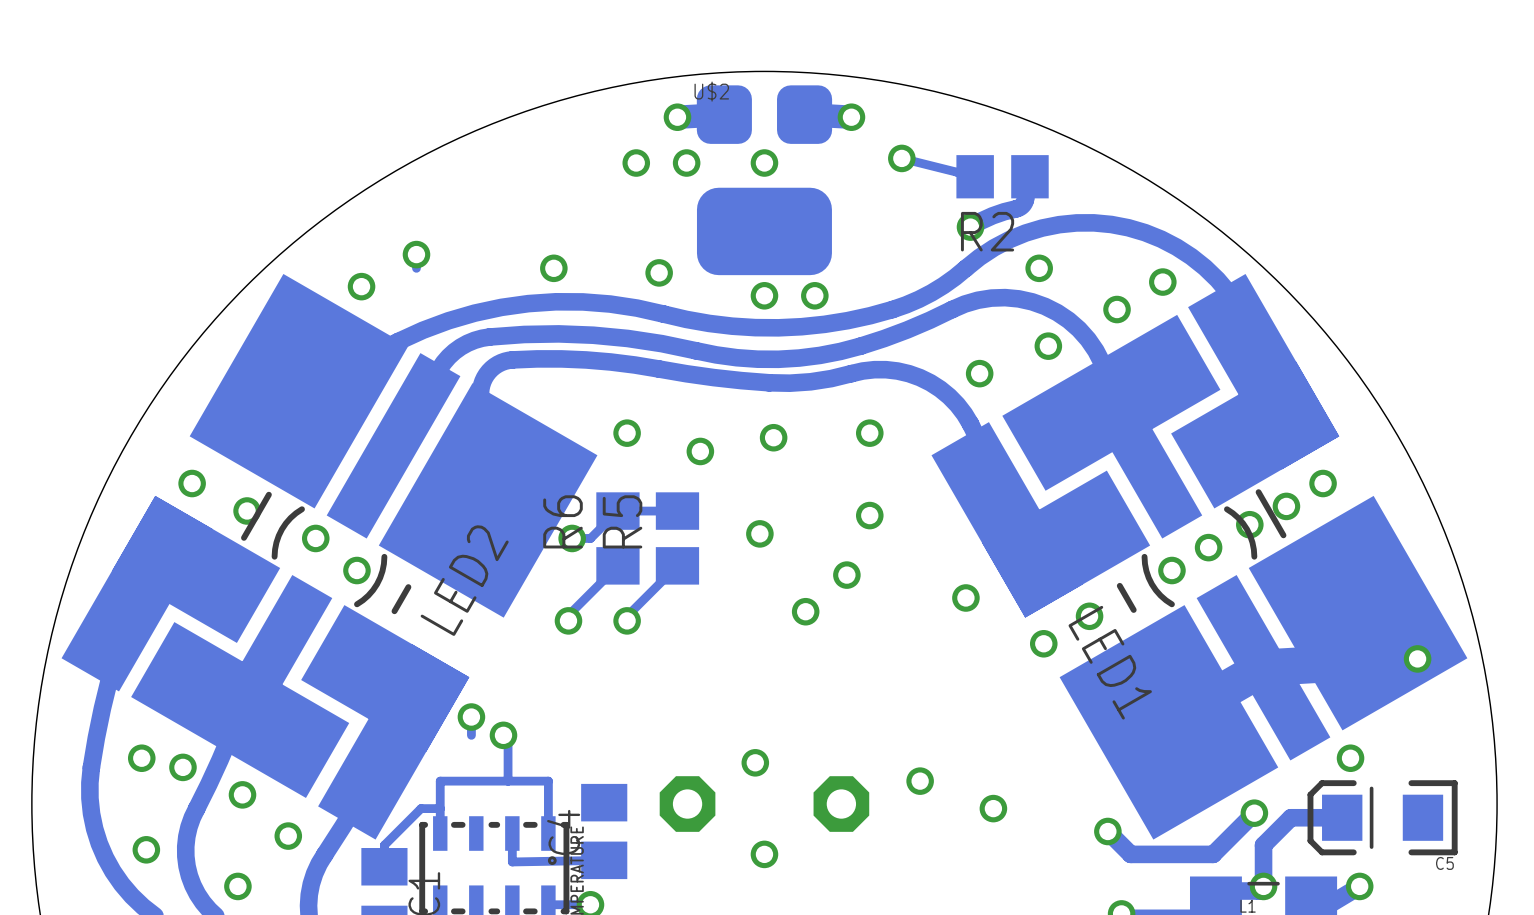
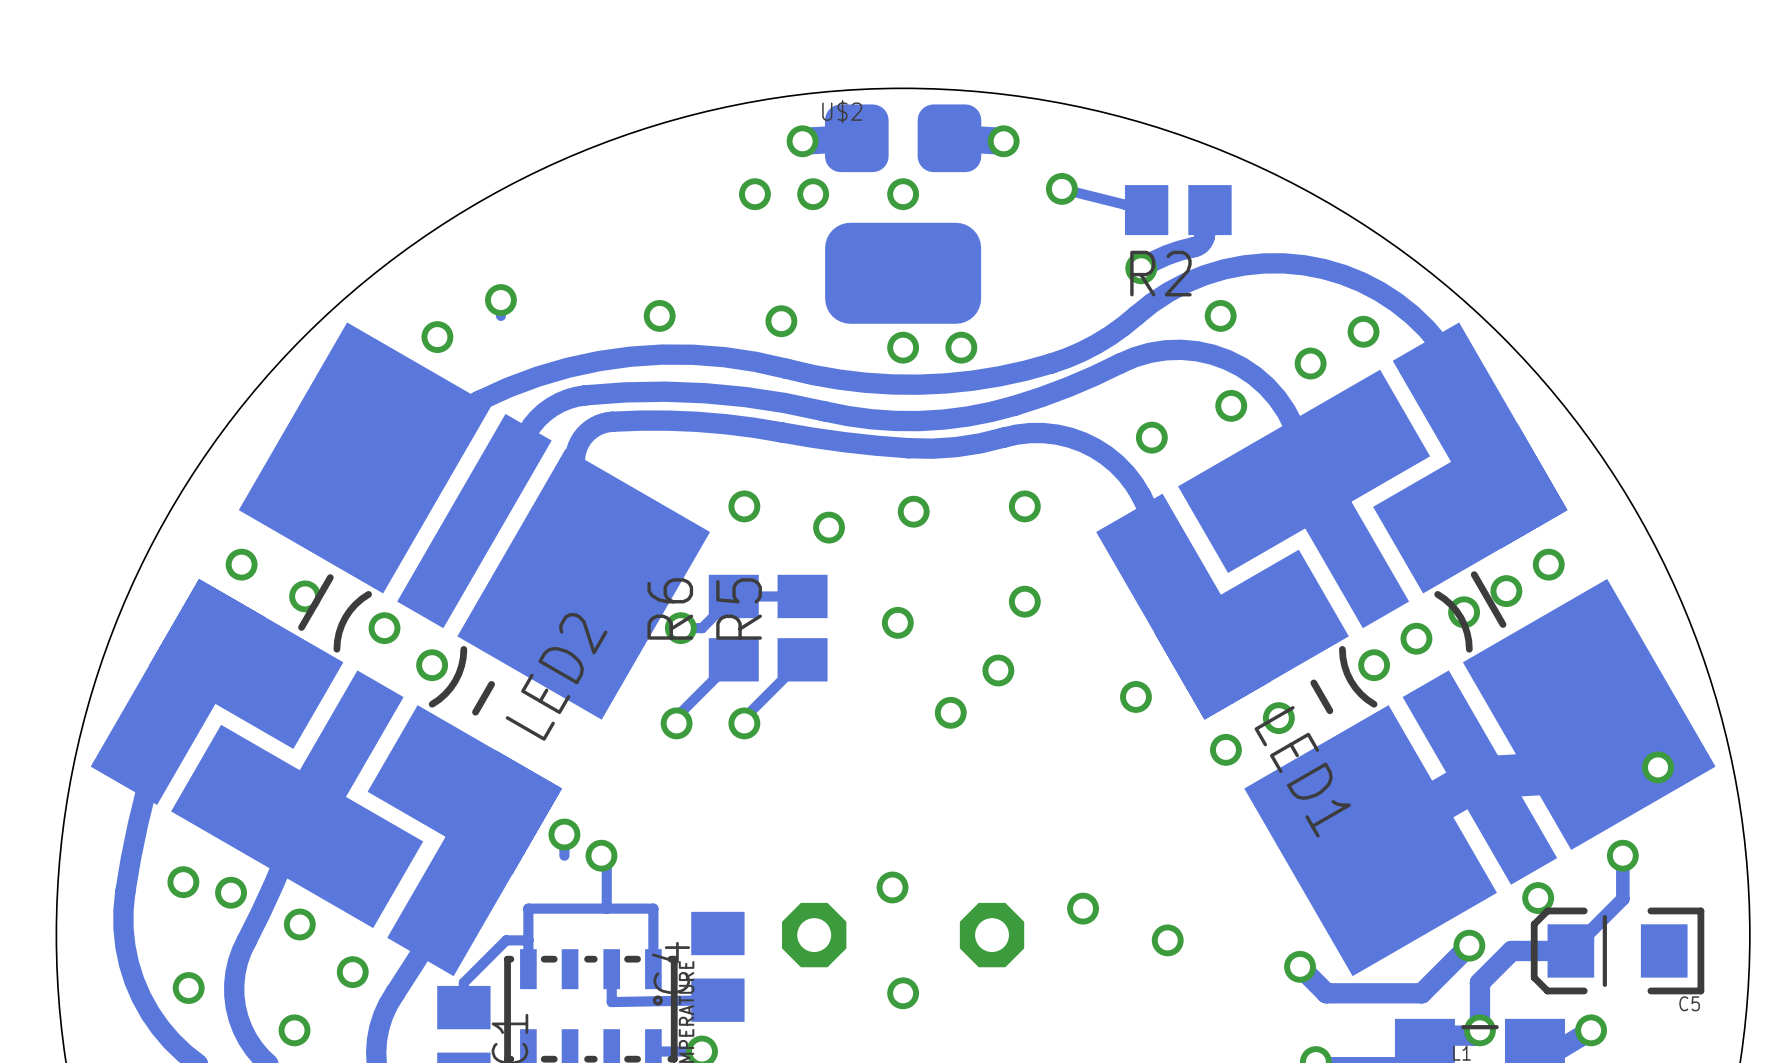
track: none -> (1622, 855) (1622, 899) (1570, 950)
via: none -> (1622, 855)
via: (1350, 758) -> none
via: none -> (1538, 898)

